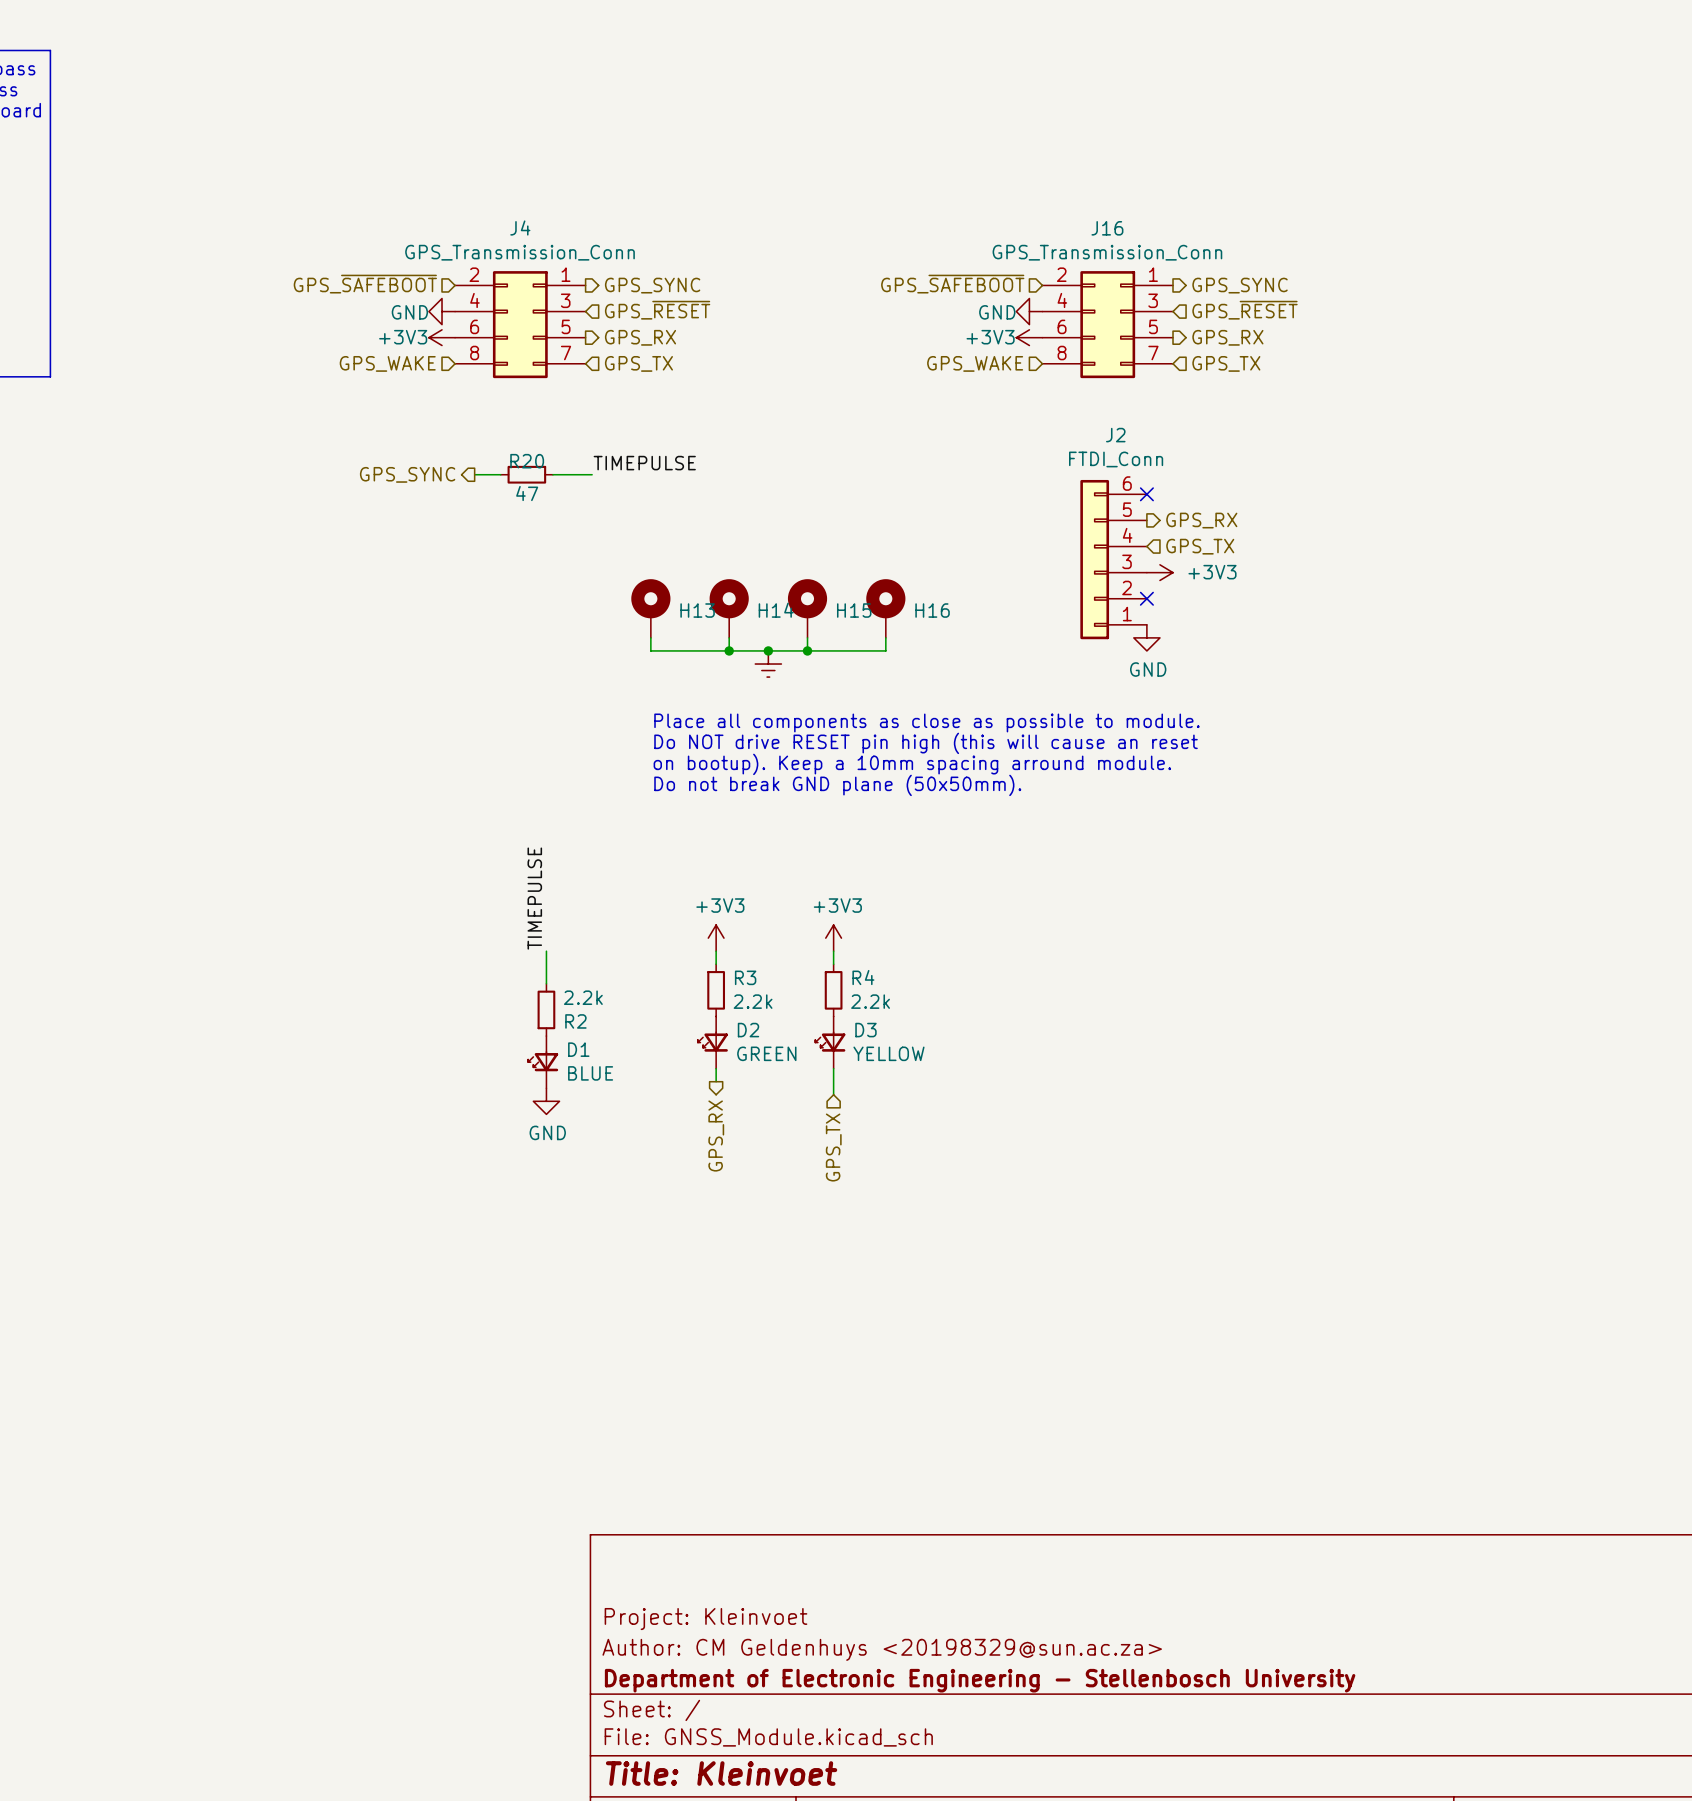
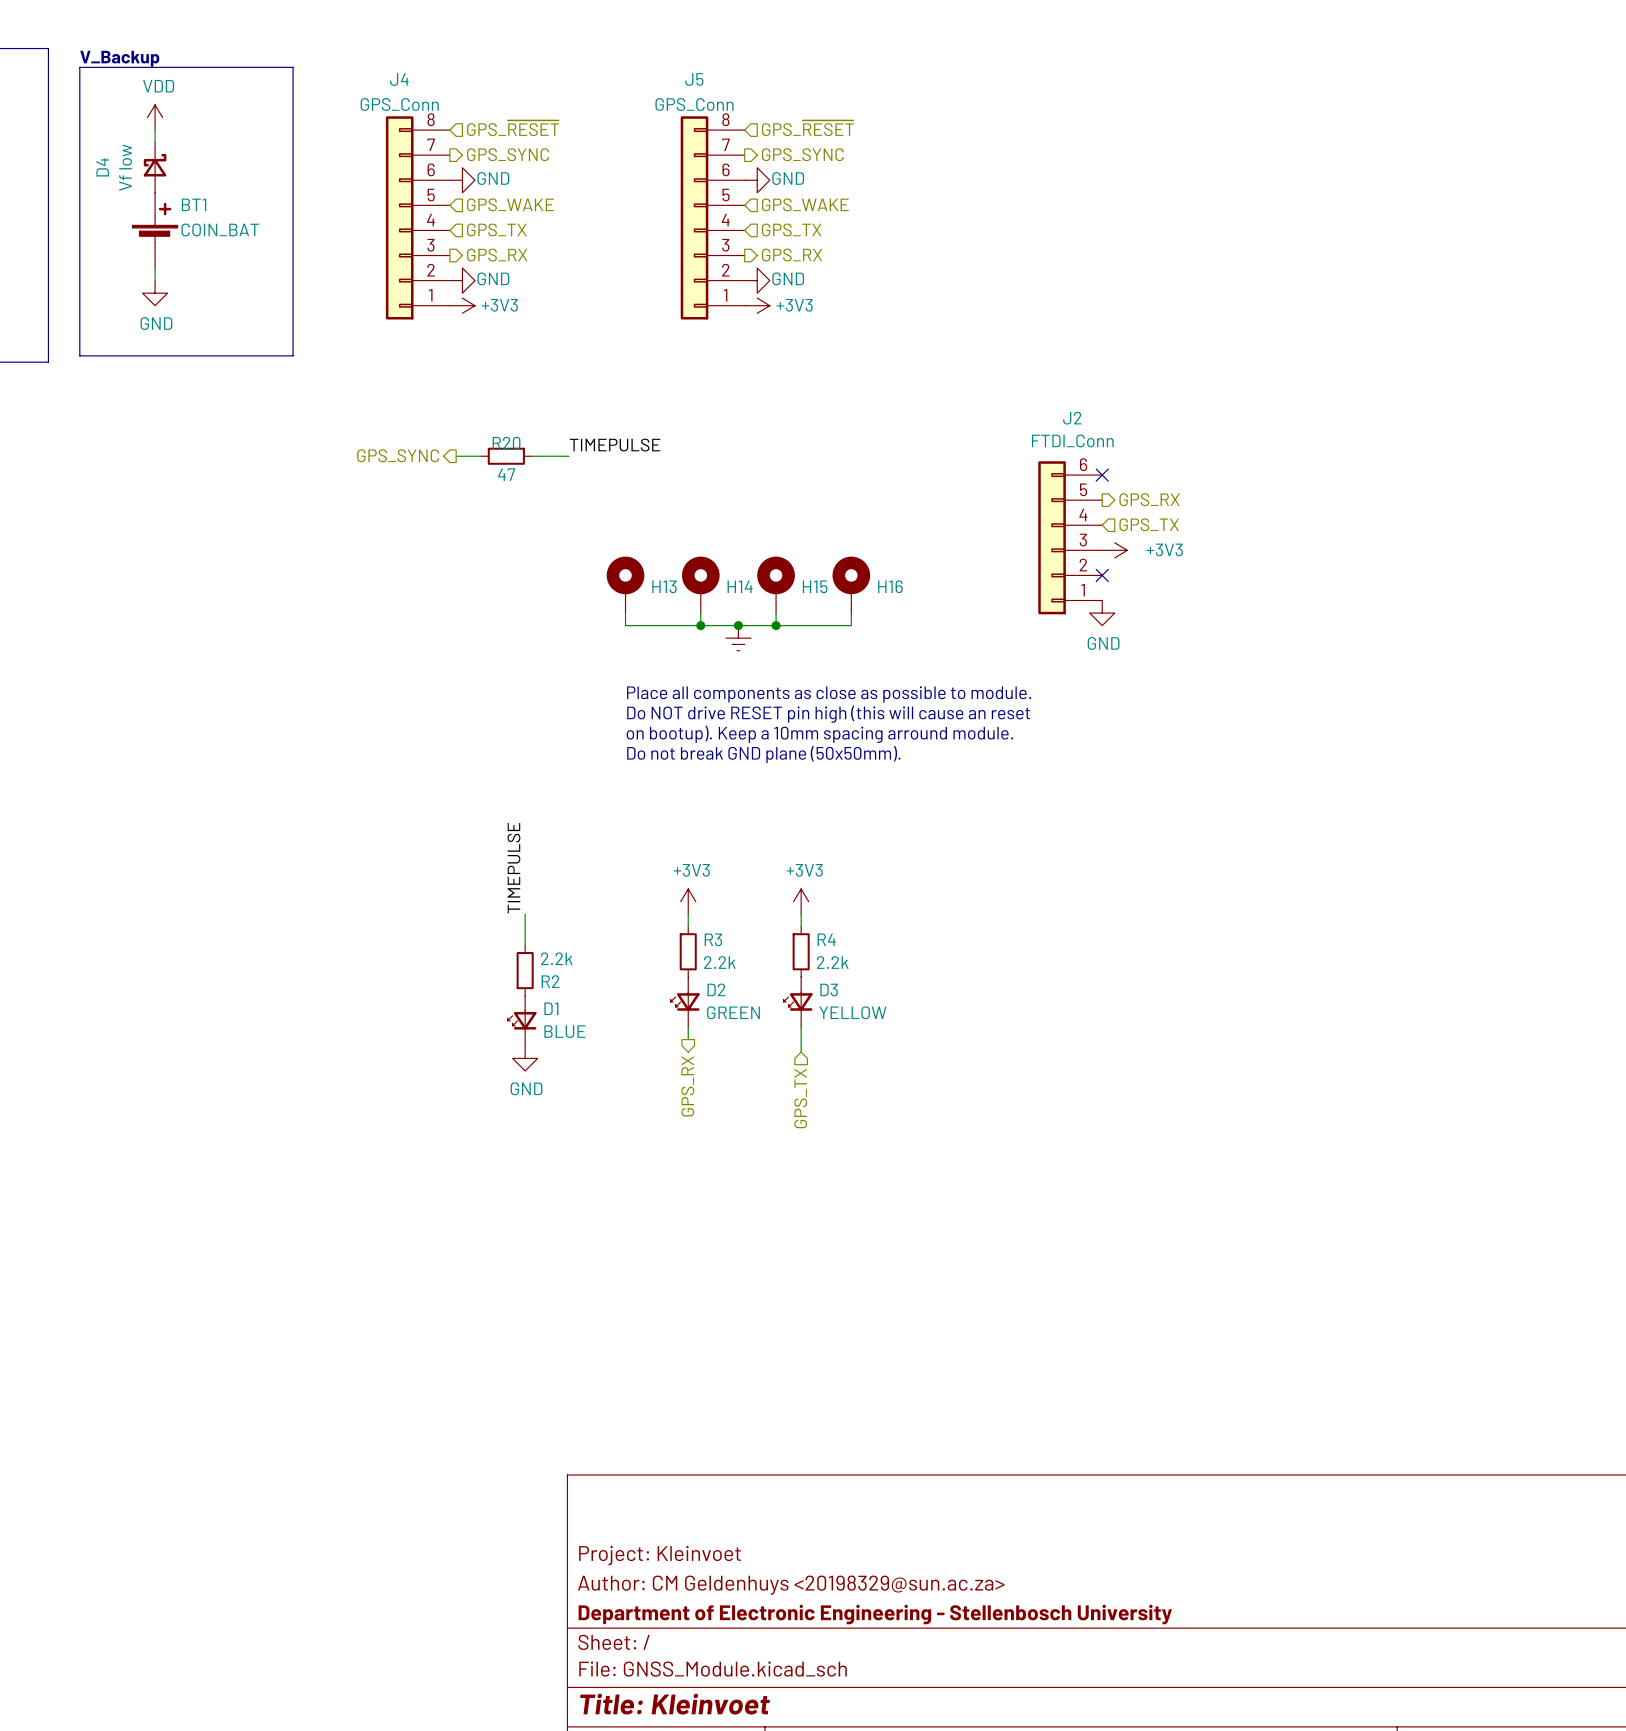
text: none -> V_Backup (119, 58)
line: none -> (79, 67) (79, 355) (293, 355) (293, 67) (79, 67)
power symbol: none -> VDD (155, 117)
hierarchical label: none -> GPS_~{RESET} (513, 128)
hierarchical label: none -> GPS_~{RESET} (807, 128)
wire: none -> (155, 130) (155, 142)
hierarchical label: none -> GPS_SYNC (508, 154)
hierarchical label: none -> GPS_SYNC (802, 154)
D4: none -> Vf low (155, 167)
power symbol: none -> GND (462, 180)
power symbol: none -> GND (757, 180)
hierarchical label: none -> GPS_WAKE (805, 204)
J5: none -> GPS_Conn (712, 217)
J4 name position: J4 (520, 228) -> J4 (399, 79)
BT1: none -> COIN_BAT (155, 230)
hierarchical label: none -> GPS_TX (496, 229)
hierarchical label: none -> GPS_TX (791, 229)
J4 value: GPS_Transmission_Conn (520, 252) -> GPS_Conn (399, 104)
hierarchical label: none -> GPS_RX (497, 255)
hierarchical label: none -> GPS_RX (792, 255)
J4 symbol: [455, 271, 586, 379] -> [385, 116, 450, 320]
wire: none -> (155, 268) (155, 280)
hierarchical label: GPS_~{SAFEBOOT} (365, 284) -> none
hierarchical label: GPS_~{SAFEBOOT} (952, 284) -> none
hierarchical label: GPS_SYNC (652, 285) -> none
hierarchical label: GPS_SYNC (1240, 285) -> none
power symbol: none -> GND (757, 280)
power symbol: none -> GND (155, 293)
hierarchical label: GPS_~{RESET} (657, 310) -> none
hierarchical label: GPS_~{RESET} (1245, 310) -> none
power symbol rotation: 0° (442, 311) -> 180° (462, 280)
power symbol position: GND (442, 311) -> GND (462, 280)
power symbol: GND (1029, 311) -> none
power symbol: none -> +3V3 (757, 305)
J16: GPS_Transmission_Conn (1107, 324) -> none
power symbol rotation: 0° (442, 337) -> 180° (462, 305)
power symbol position: +3V3 (442, 337) -> +3V3 (462, 305)
hierarchical label: GPS_RX (640, 337) -> none
power symbol: +3V3 (1029, 337) -> none
hierarchical label: GPS_RX (1227, 337) -> none
hierarchical label rotation: 0° (387, 363) -> 180° (510, 204)
hierarchical label position: GPS_WAKE (387, 363) -> GPS_WAKE (510, 204)
hierarchical label: GPS_TX (638, 363) -> none
hierarchical label: GPS_WAKE (975, 363) -> none
hierarchical label: GPS_TX (1226, 363) -> none

